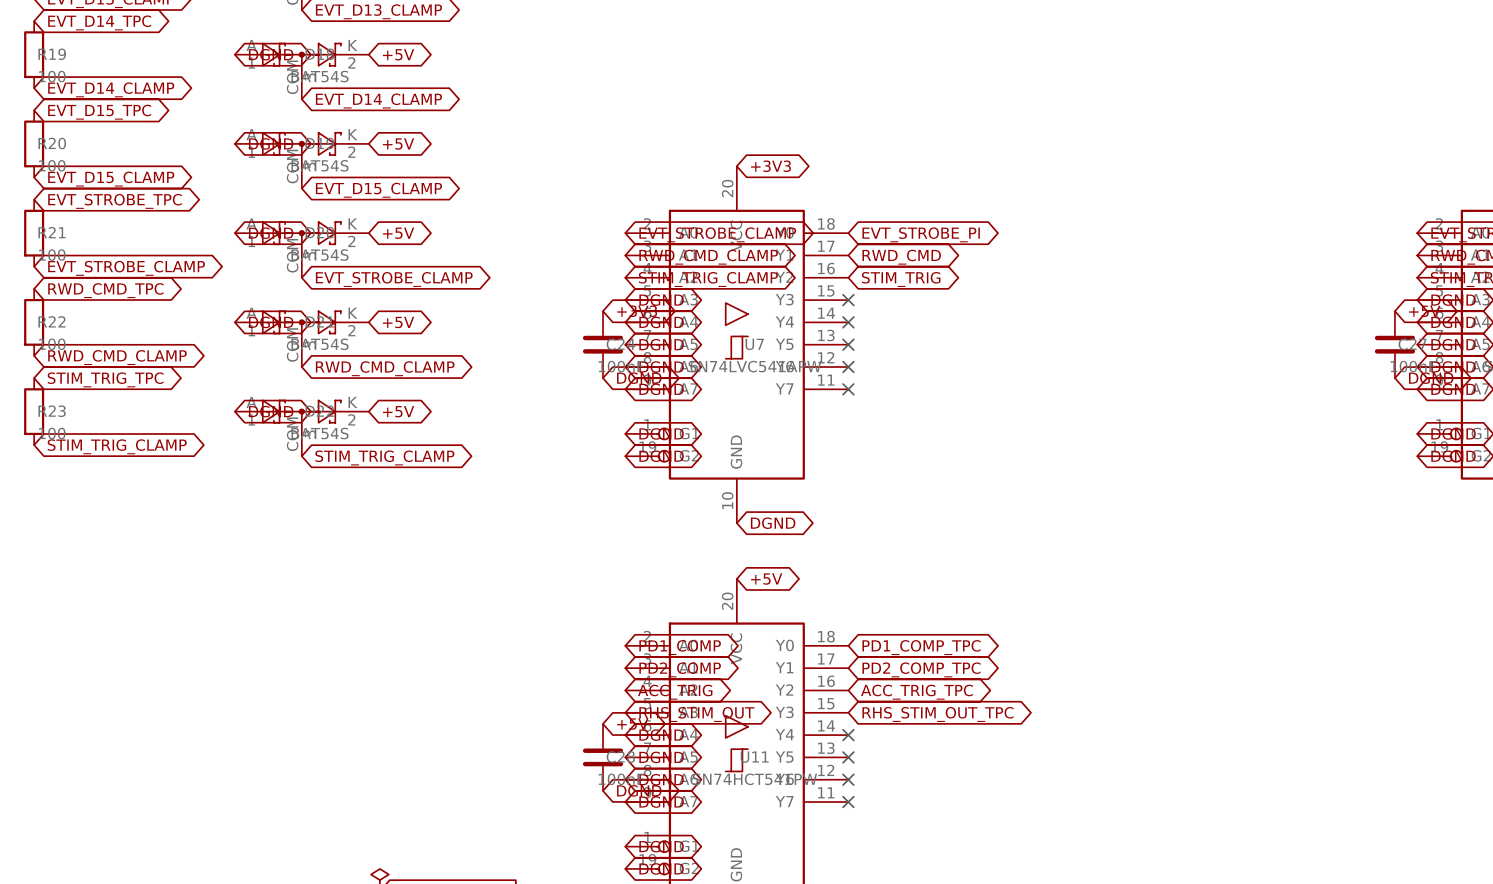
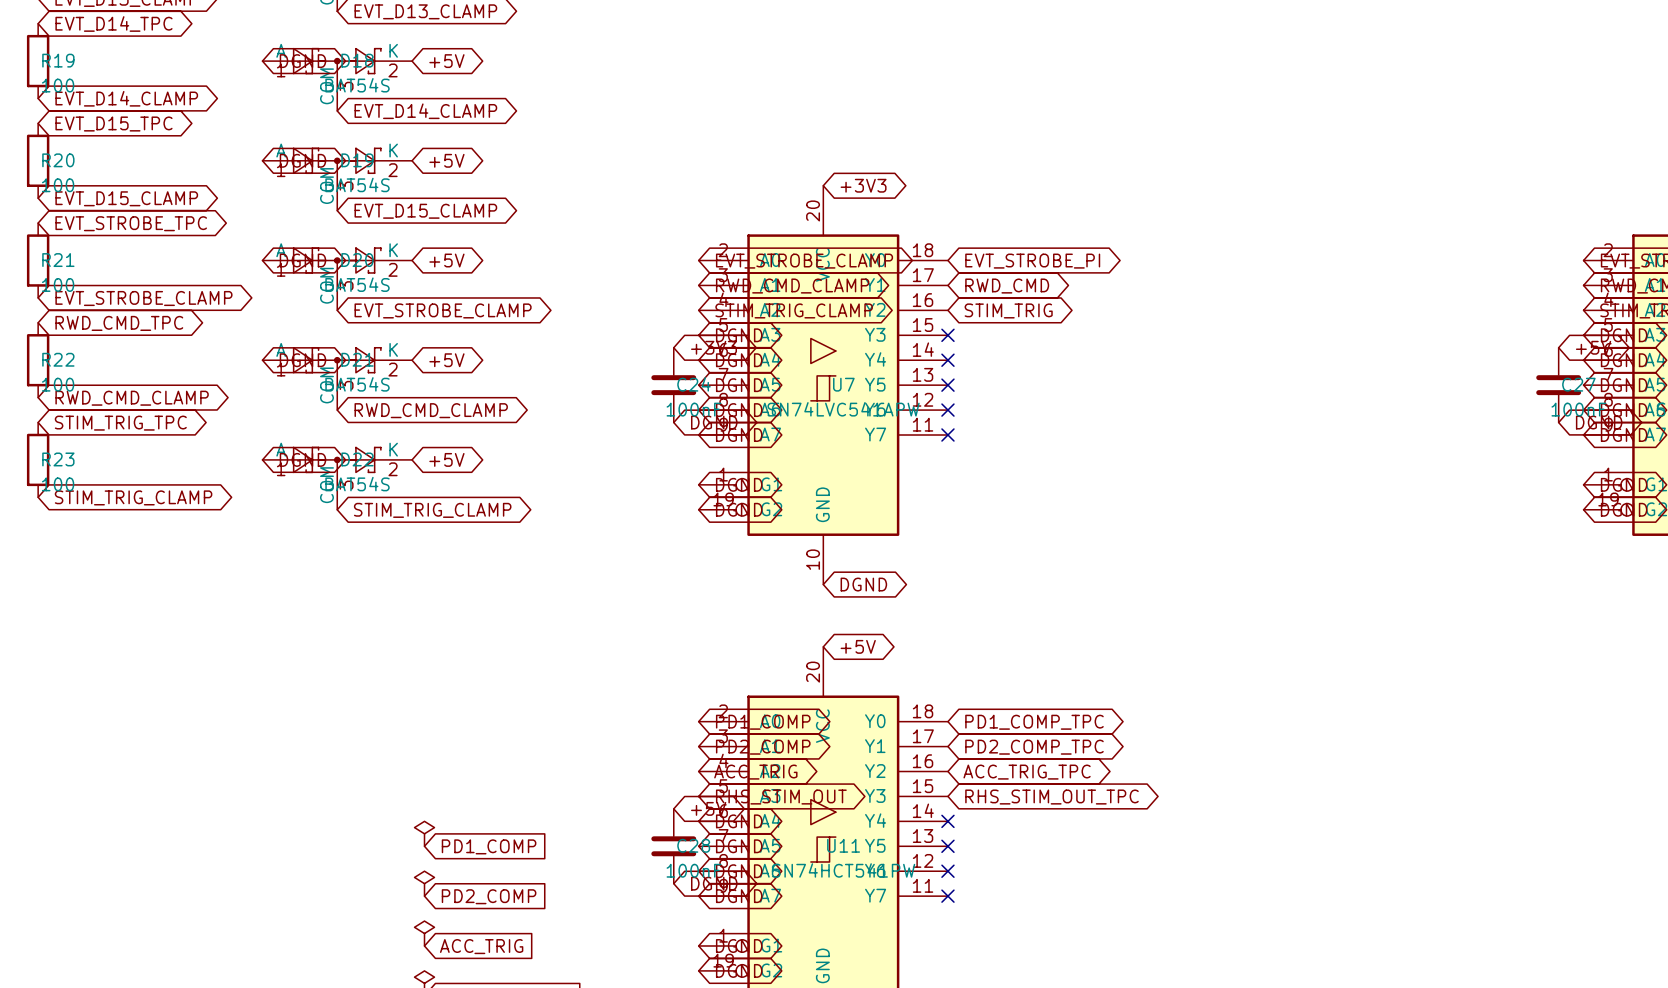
power symbol: none -> (424, 833)
global label: none -> PD1_COMP (489, 846)
power symbol: none -> (424, 883)
global label: none -> PD2_COMP (489, 896)
power symbol: none -> (424, 933)
global label: none -> ACC_TRIG (481, 946)

